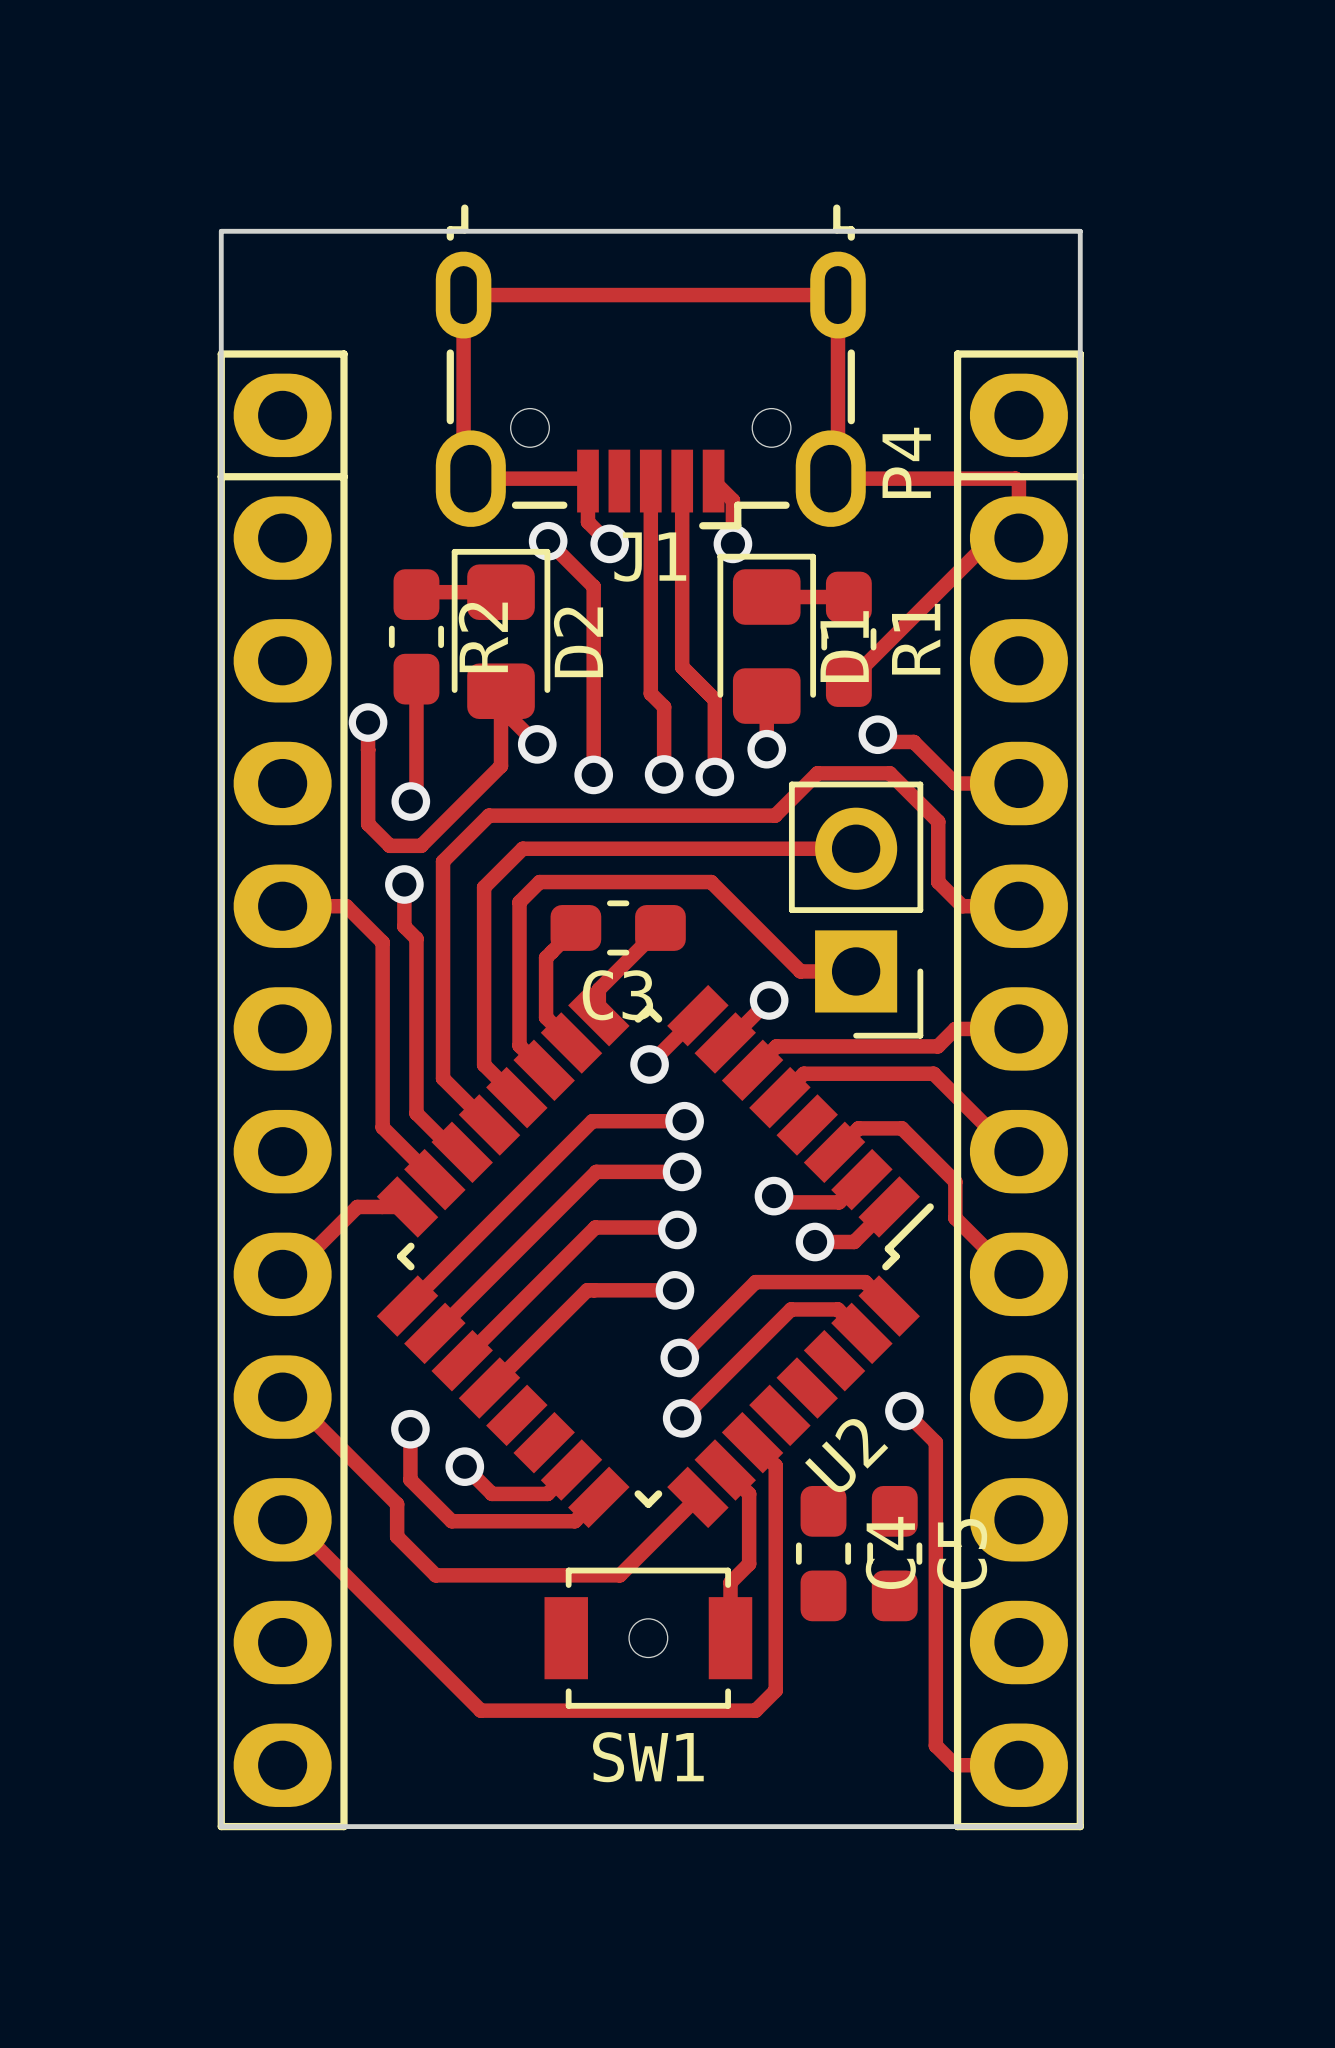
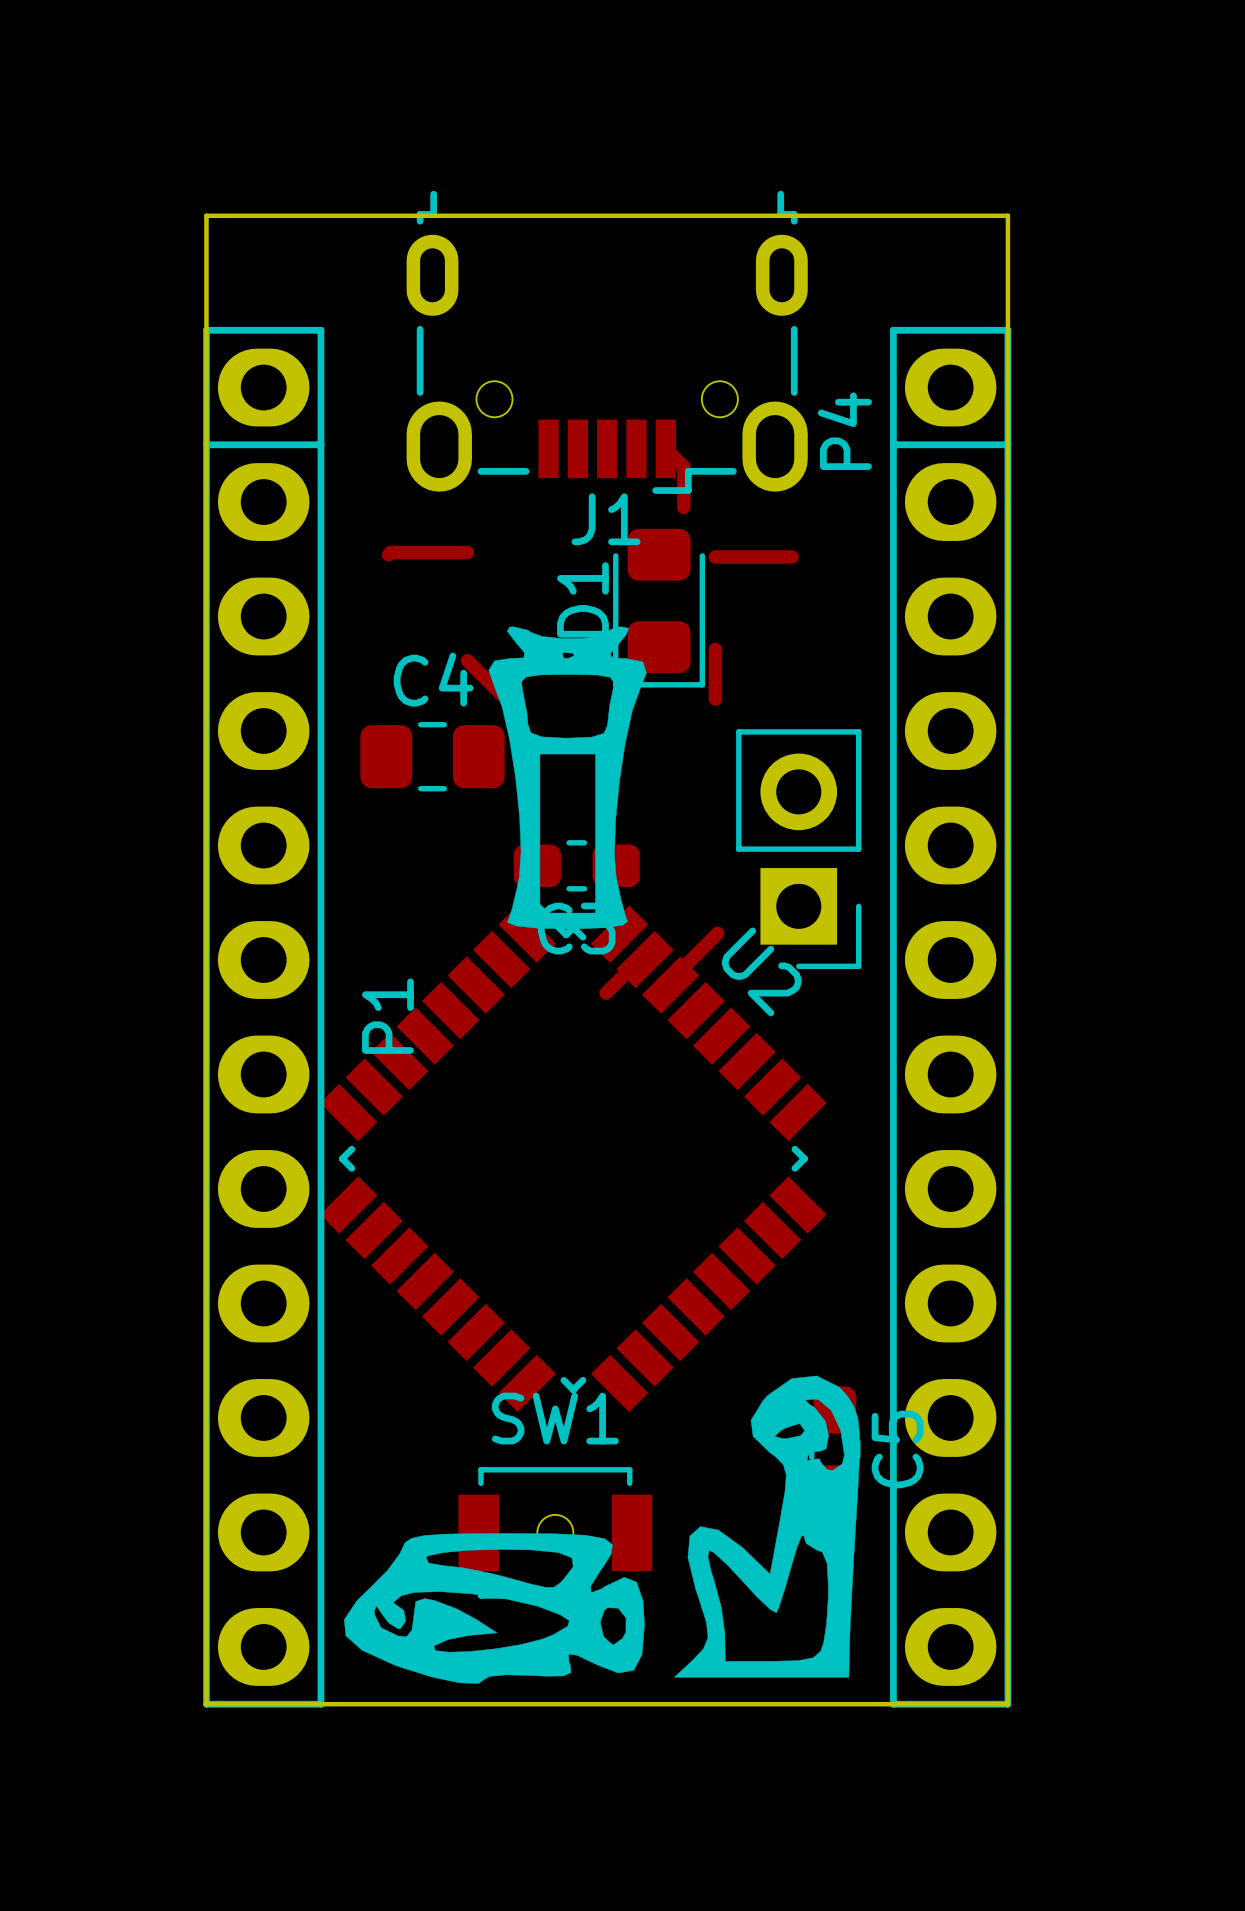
track: (650, 481) (650, 693) (664, 706) (664, 774) -> none
track: (682, 481) (682, 667) (714, 699) (714, 776) -> none
track: (548, 541) (593, 586) (593, 774) -> none
via: (548, 541) -> none
track: (609, 543) (587, 522) (587, 481) (585, 478) (470, 478) (463, 471) (463, 295) (838, 295) (838, 471) (830, 478) (1015, 478) (1018, 481) (1018, 538) (992, 538) (848, 681) -> none
via: (609, 543) -> none
via: (732, 543) -> none
D2: (501, 633) -> none
R2: (416, 636) -> none
D1 rotation: 0° (766, 638) -> 180° (659, 608)
R1: (848, 639) -> none
drawing: none -> [488, 626, 647, 930]
track: (416, 679) (416, 795) (410, 801) -> none
track: (501, 691) (501, 765) (421, 845) (389, 845) (368, 824) (368, 722) -> none
via: (368, 722) -> none
via: (877, 734) -> none
track: (873, 741) (913, 741) (955, 783) (1018, 783) -> none
via: (537, 744) -> none
via: (766, 749) -> none
via: (593, 774) -> none
via: (664, 774) -> none
via: (714, 776) -> none
via: (410, 801) -> none
track: (856, 848) (522, 848) (484, 887) (484, 1064) (516, 1097) -> none
track: (404, 884) (404, 926) (416, 938) (416, 1113) (455, 1152) (462, 1152) -> none
via: (404, 884) -> none
track: (282, 906) (346, 906) (382, 942) (382, 1127) (434, 1179) -> none
track: (1018, 906) (962, 906) (938, 882) (938, 821) (889, 773) (817, 773) (775, 815) (488, 815) (443, 861) (443, 1078) (489, 1124) -> none
track: (575, 927) (546, 957) (546, 1017) (571, 1042) -> none
track: (660, 927) (598, 989) (598, 1015) -> none
track: (856, 971) (800, 971) (711, 882) (539, 882) (519, 902) (519, 1045) (544, 1070) -> none
via: (769, 1000) -> none
track: (1018, 1028) (955, 1028) (937, 1046) (776, 1046) (752, 1070) -> none
via: (649, 1064) -> none
P1 name: none -> P1 (387, 1016)
track: (779, 1097) (803, 1073) (933, 1073) (1011, 1151) (1018, 1151) -> none
track: (684, 1121) (592, 1121) (407, 1306) -> none
via: (684, 1121) -> none
track: (834, 1152) (858, 1128) (901, 1128) (955, 1181) (955, 1218) (1011, 1274) (1018, 1274) -> none
track: (682, 1171) (596, 1171) (434, 1333) -> none
via: (682, 1171) -> none
track: (861, 1179) (839, 1202) (780, 1202) (773, 1196) -> none
via: (773, 1196) -> none
track: (407, 1206) (357, 1206) (290, 1274) (282, 1274) -> none
track: (889, 1206) (854, 1242) (815, 1242) -> none
track: (677, 1229) (674, 1227) (595, 1227) (462, 1360) -> none
via: (677, 1229) -> none
via: (815, 1242) -> none
U2 rotation: 0° (655, 1256) -> 90° counterclockwise (573, 1152)
track: (674, 1290) (587, 1290) (489, 1388) -> none
via: (674, 1290) -> none
track: (889, 1306) (865, 1282) (755, 1282) (679, 1357) -> none
track: (861, 1333) (837, 1309) (791, 1309) (682, 1418) -> none
via: (679, 1357) -> none
track: (282, 1397) (290, 1397) (397, 1504) (397, 1536) (435, 1575) (619, 1575) (697, 1497) -> none
track: (904, 1411) (935, 1442) (935, 1745) (955, 1765) (1018, 1765) -> none
via: (904, 1411) -> none
via: (682, 1418) -> none
track: (410, 1429) (410, 1479) (451, 1521) (574, 1521) (598, 1497) -> none
via: (410, 1429) -> none
track: (752, 1442) (775, 1465) (775, 1690) (755, 1710) (480, 1710) (290, 1519) (282, 1519) -> none
track: (464, 1466) (492, 1493) (547, 1493) (571, 1470) -> none
via: (464, 1466) -> none
track: (725, 1470) (749, 1493) (749, 1563) (730, 1582) (730, 1638) -> none
drawing: none -> [344, 1375, 860, 1684]
C4 footprint: [795, 1485, 852, 1622] -> [360, 721, 505, 792]
C4 name position: C4 (890, 1552) -> C4 (433, 679)
SW1 position: (648, 1638) -> (555, 1532)
SW1 name position: SW1 (648, 1757) -> SW1 (555, 1418)

